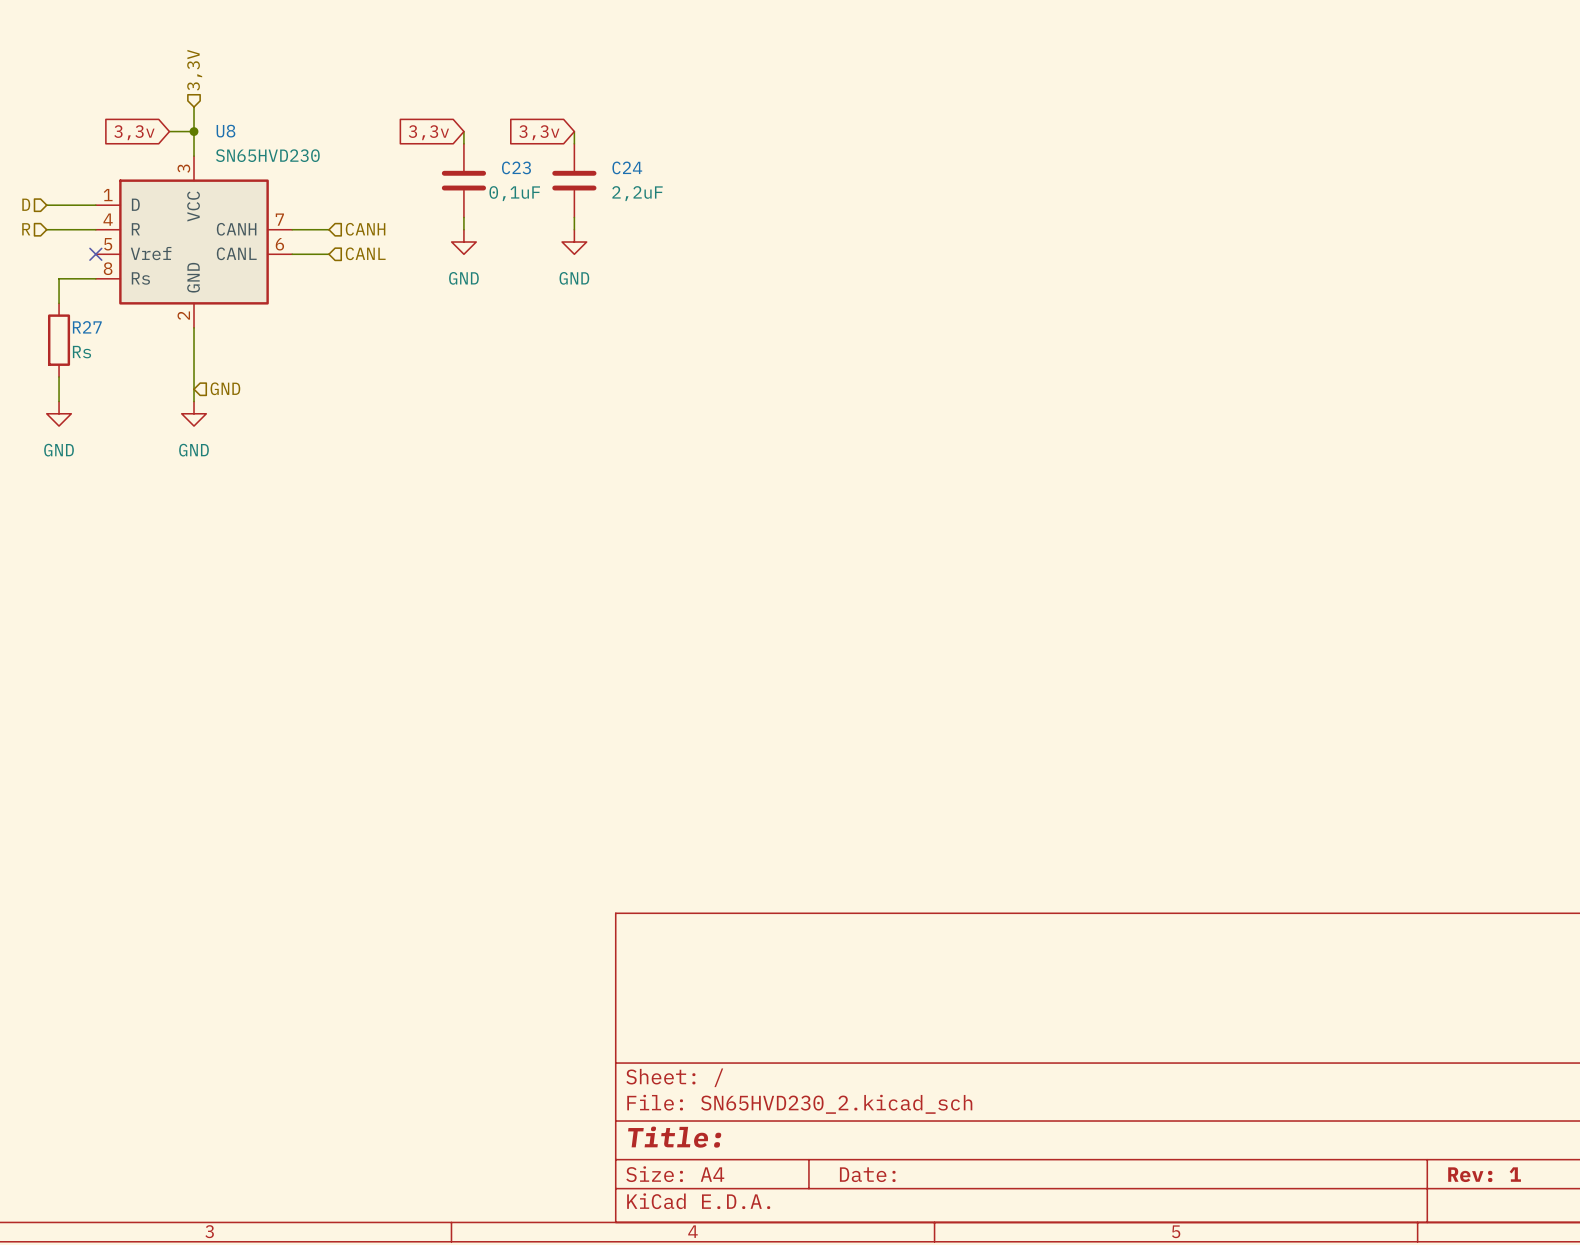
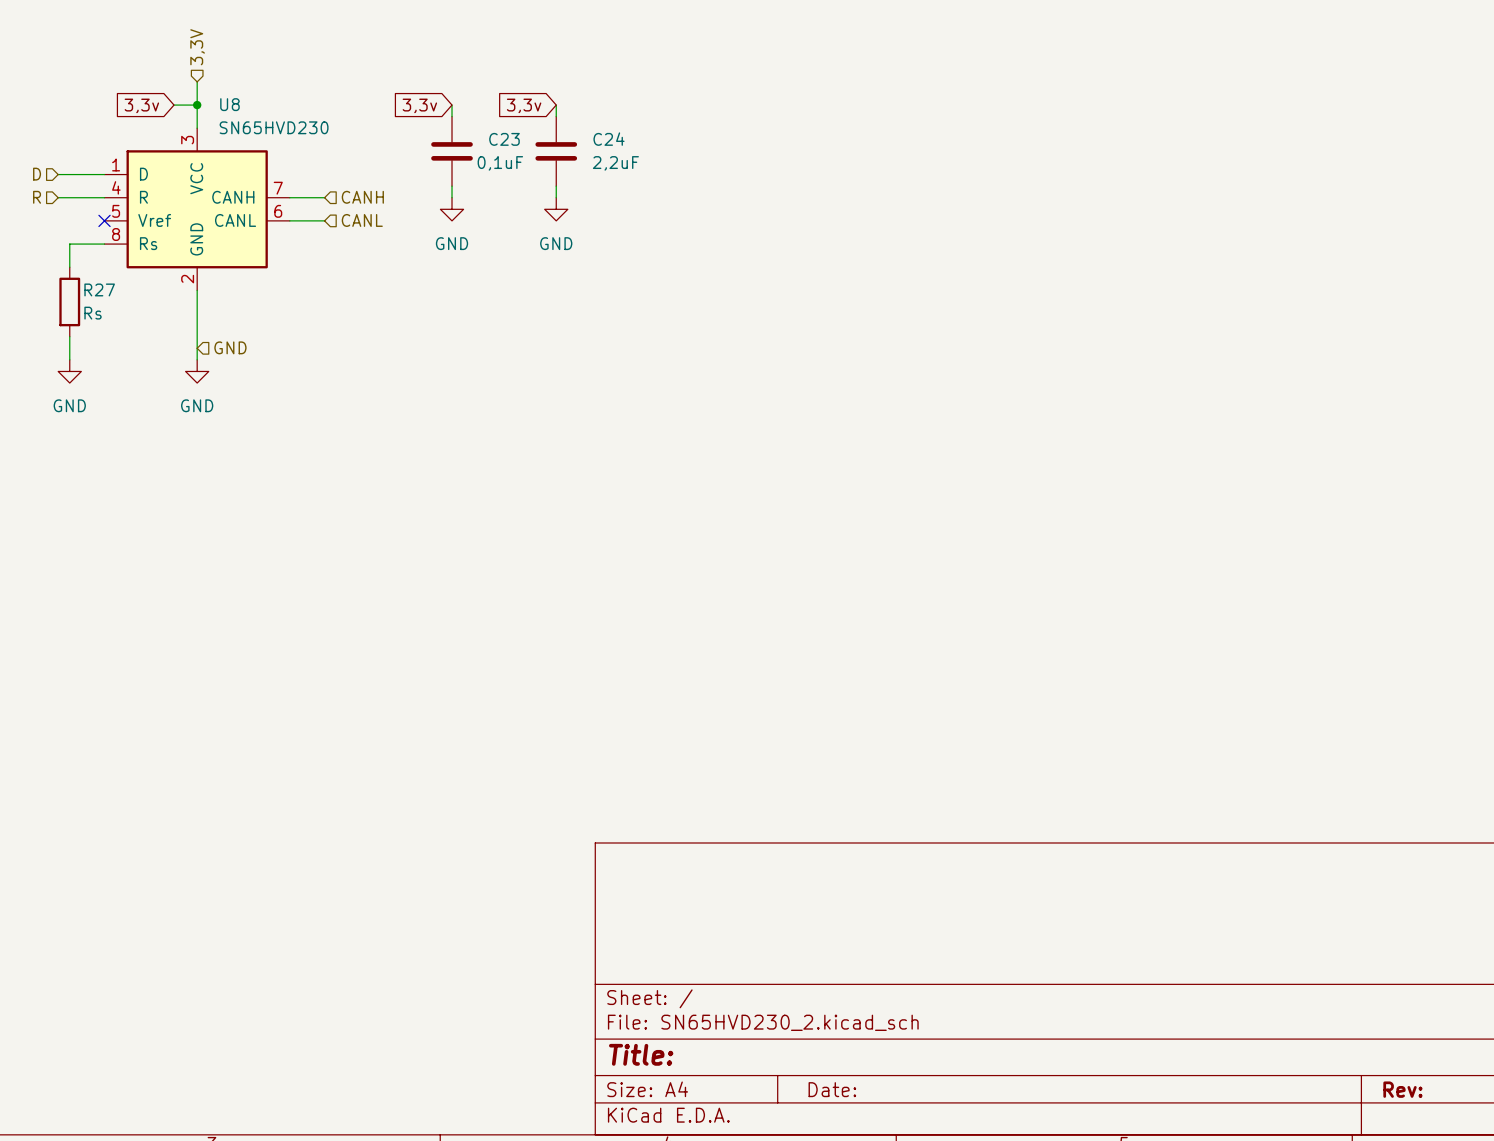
title block: Rev: 1 (1484, 1174) -> Rev: (1402, 1089)

